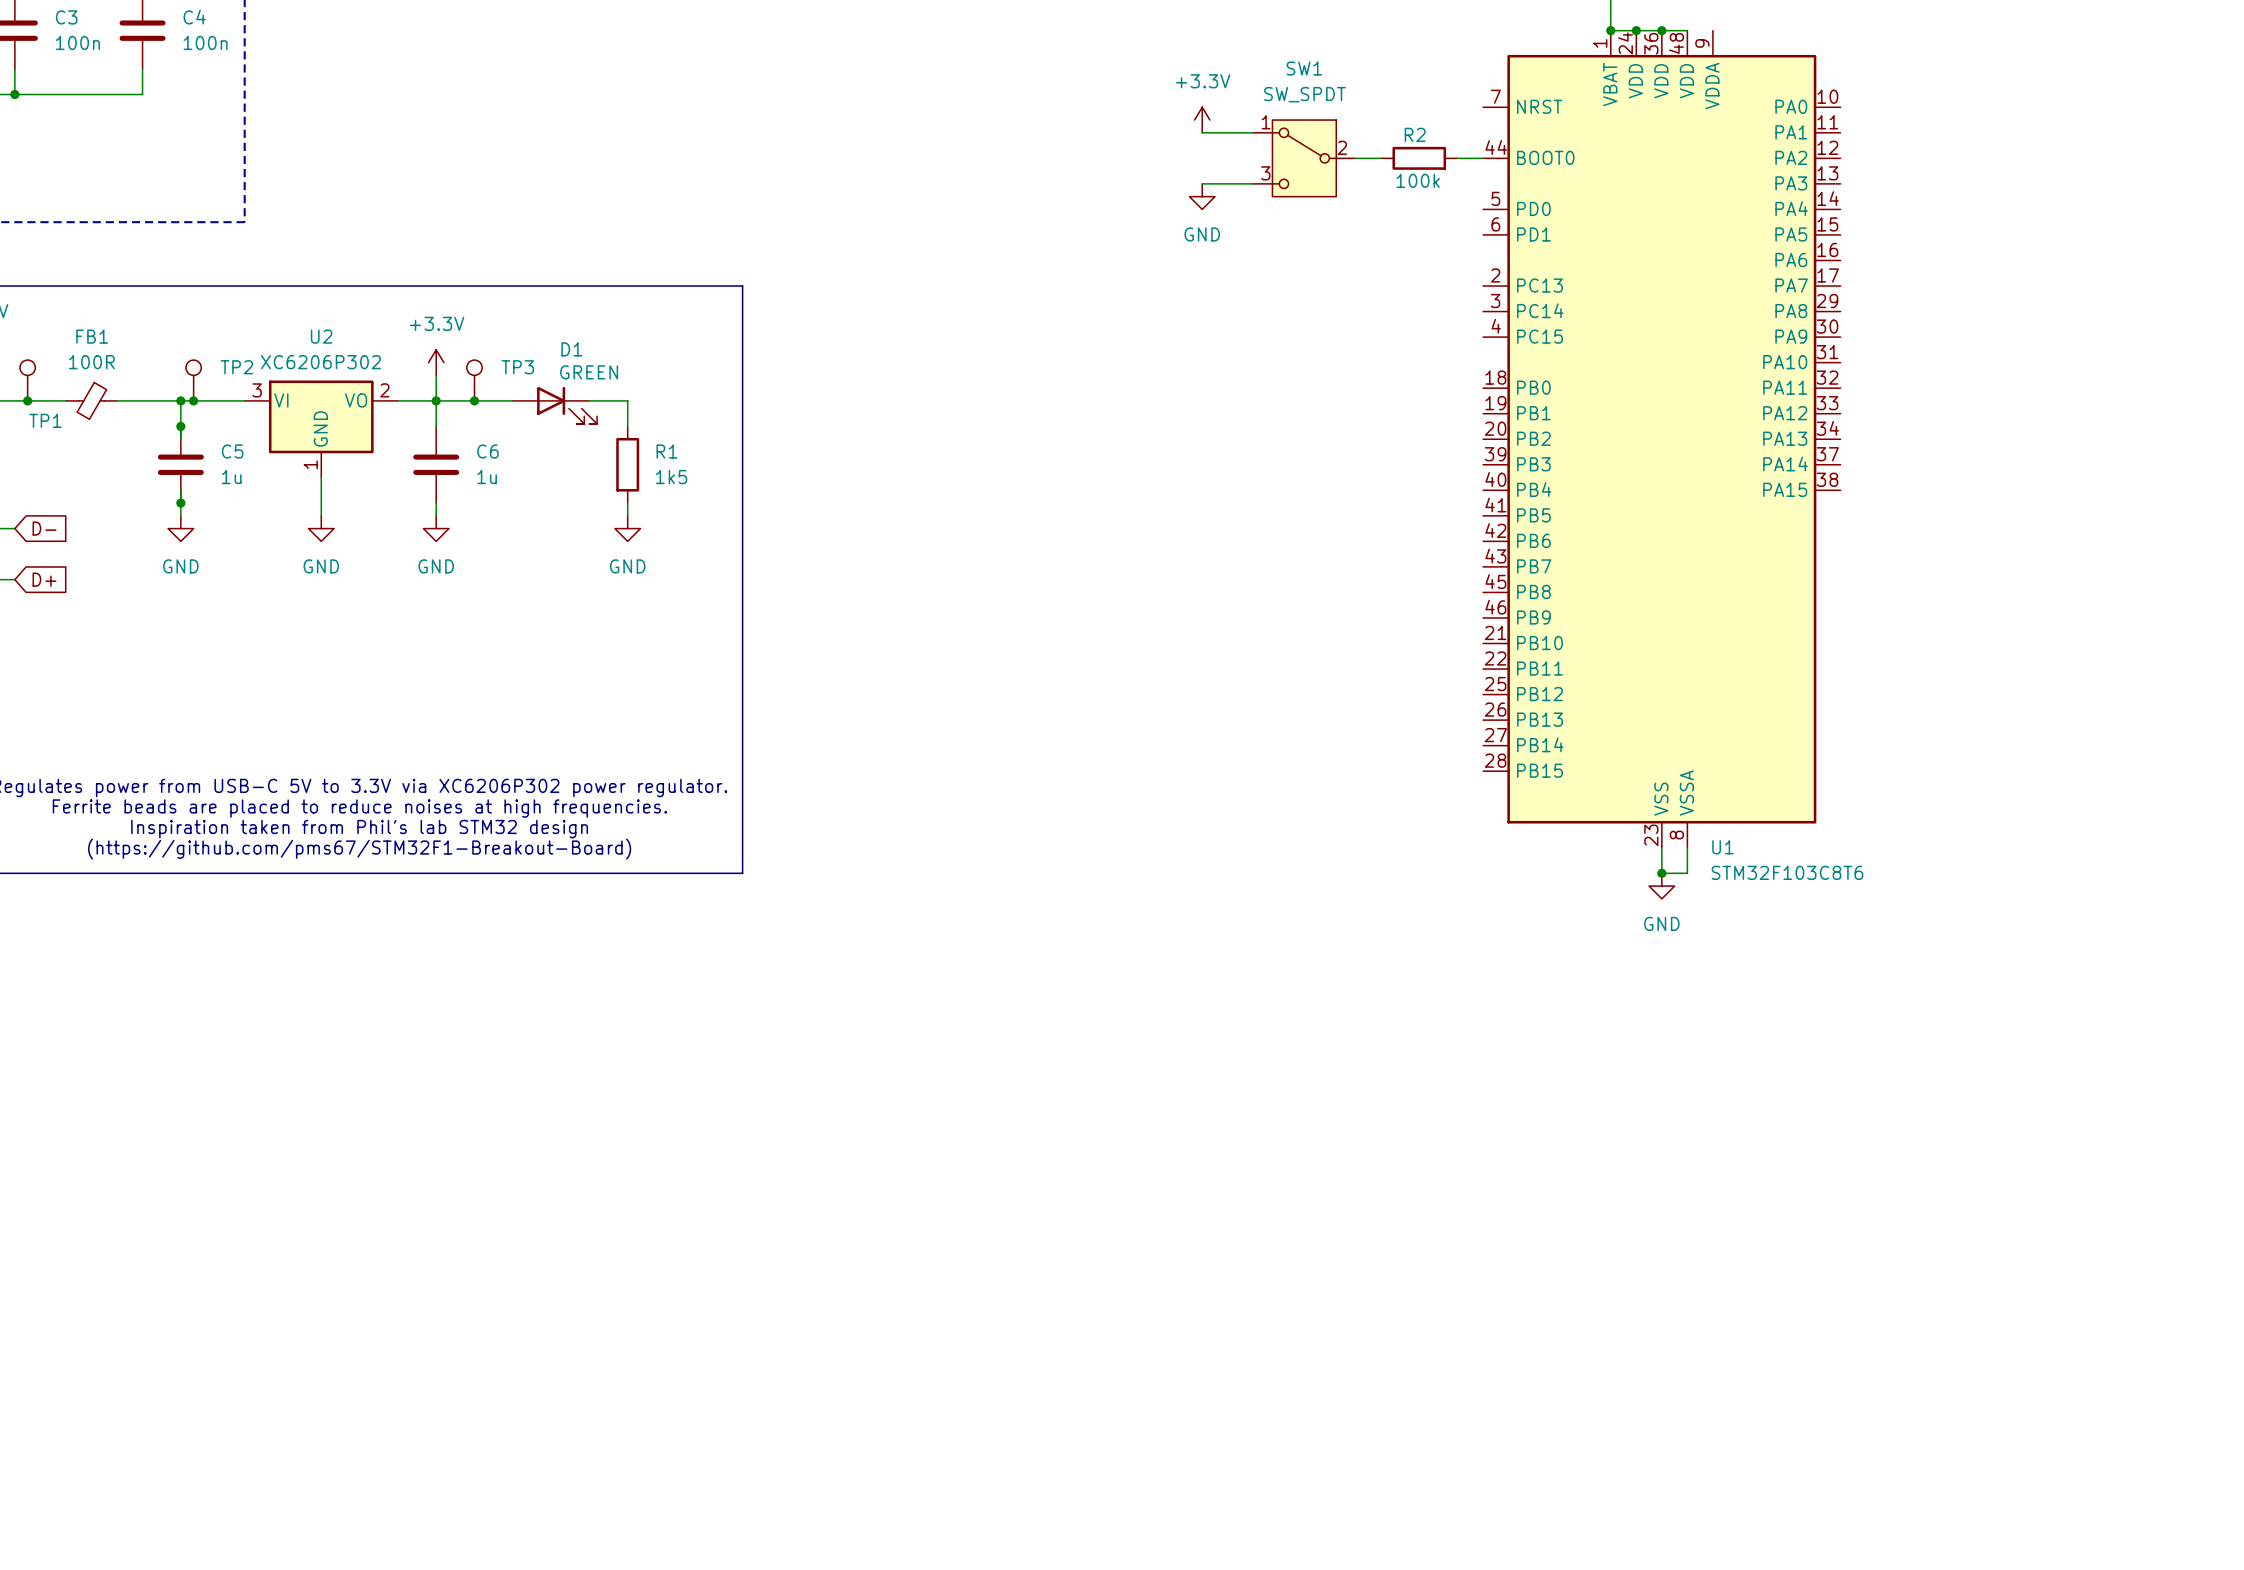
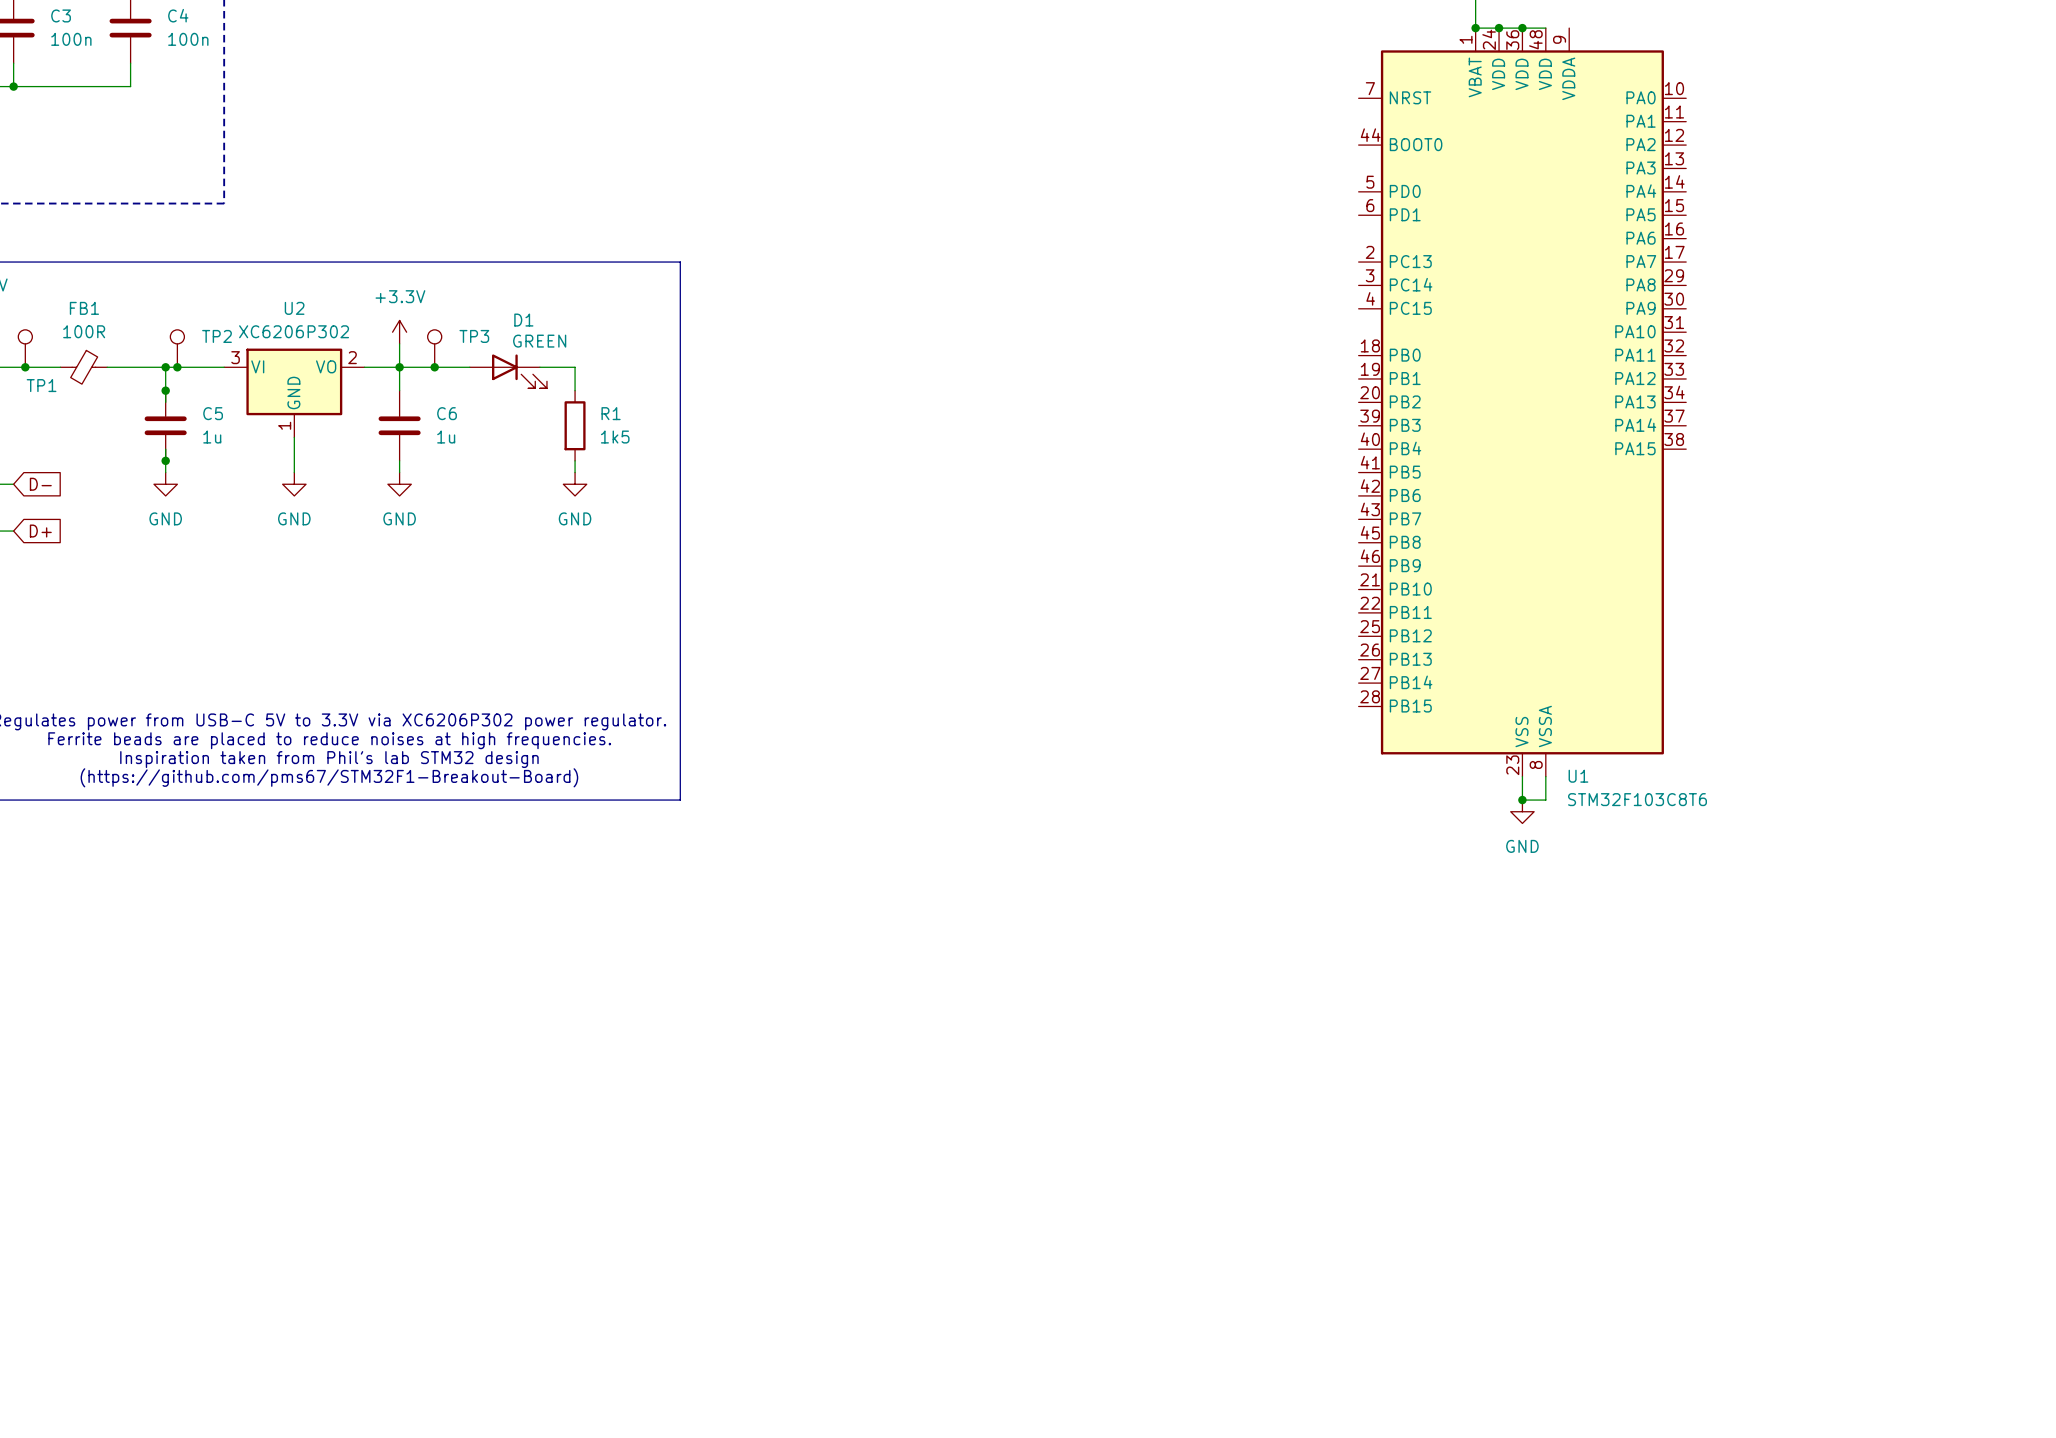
power symbol: +3.3V (1202, 120) -> none
wire: (1202, 132) (1253, 132) -> none
SW1: SW_SPDT (1304, 158) -> none
wire: (1355, 158) (1380, 158) -> none
R2: 100k (1419, 158) -> none
wire: (1457, 158) (1483, 158) -> none
wire: (1202, 183) (1253, 183) -> none
power symbol: GND (1202, 196) -> none

